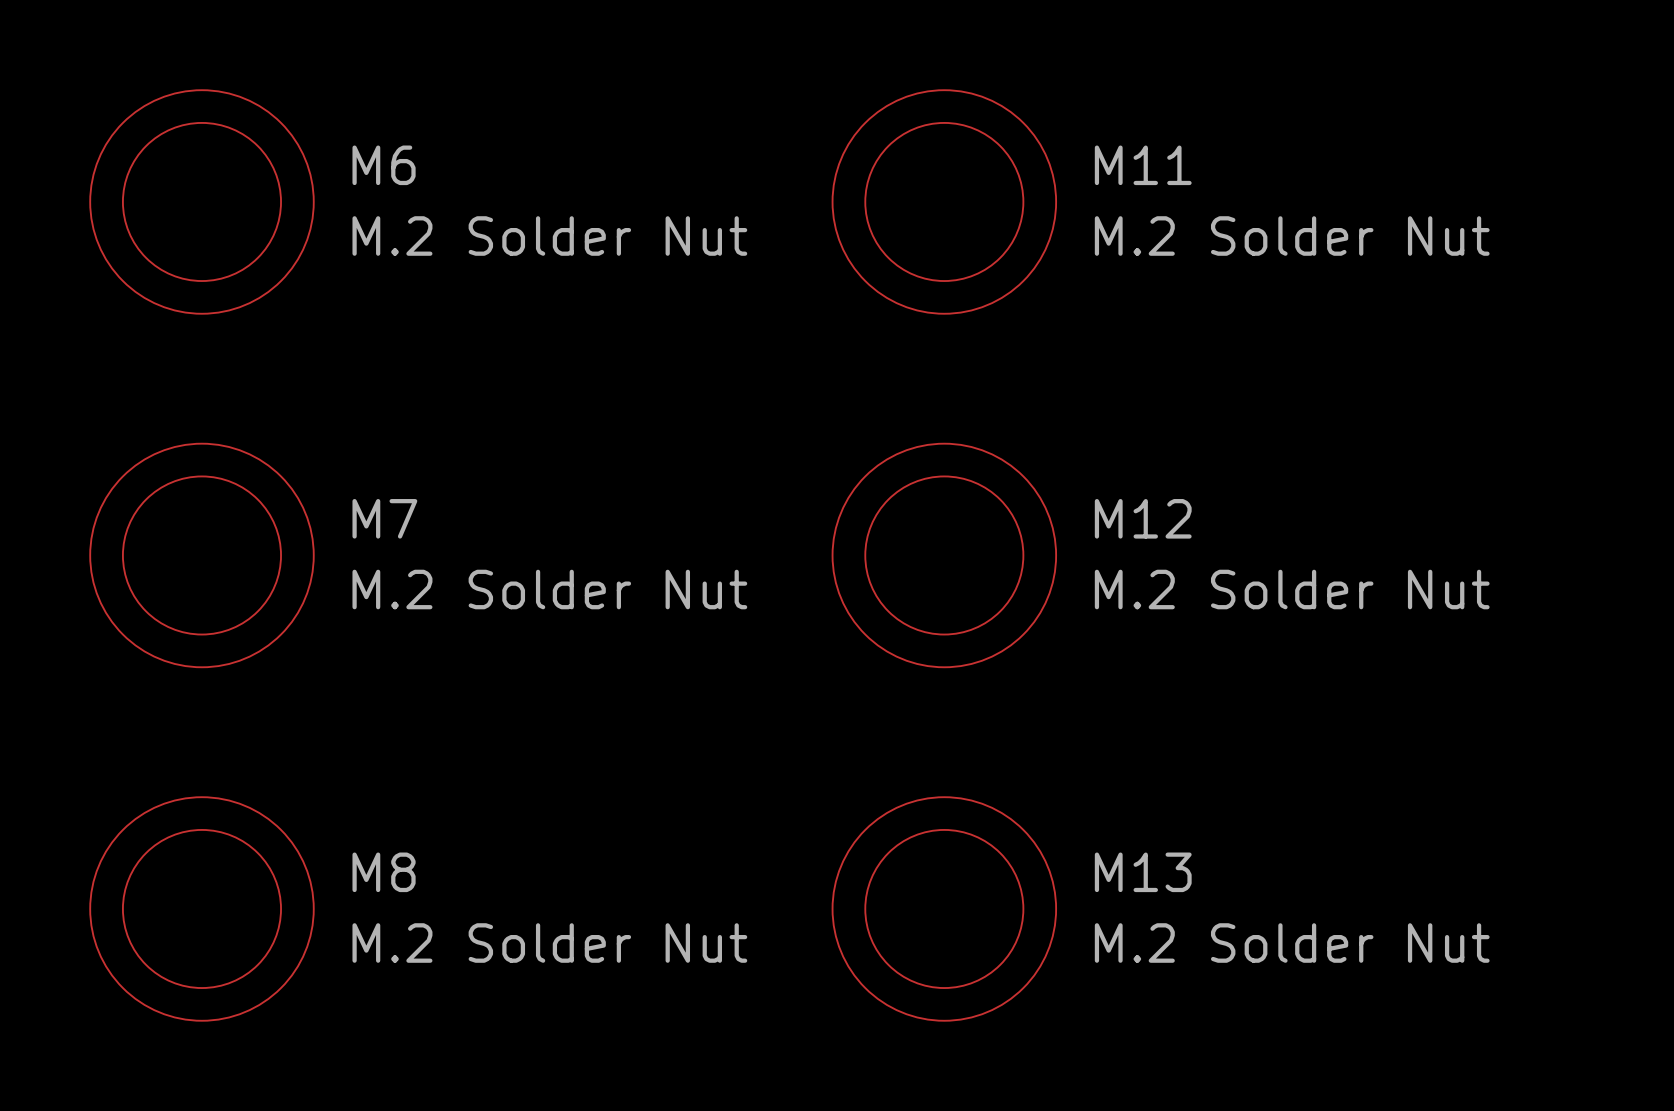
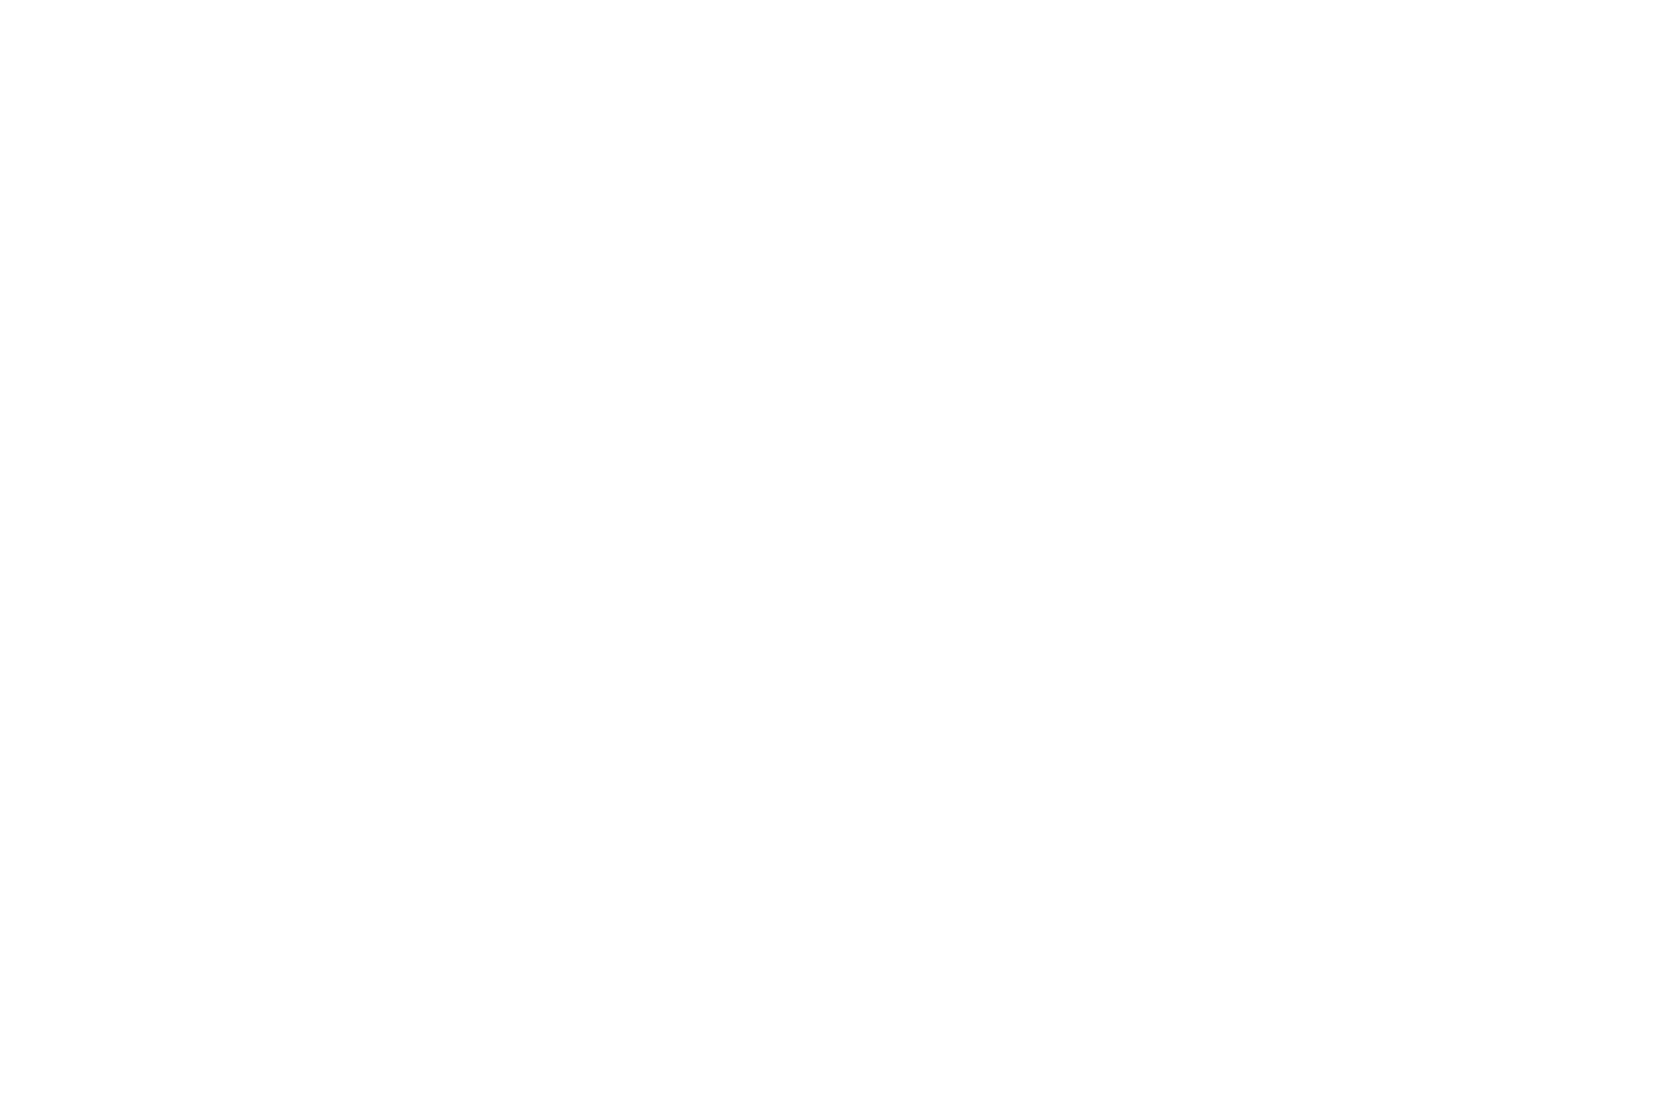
M6: M.2 Solder Nut (201, 201) -> none
M11: M.2 Solder Nut (944, 201) -> none
M7: M.2 Solder Nut (201, 555) -> none
M12: M.2 Solder Nut (944, 555) -> none
M8: M.2 Solder Nut (201, 908) -> none
M13: M.2 Solder Nut (944, 908) -> none

